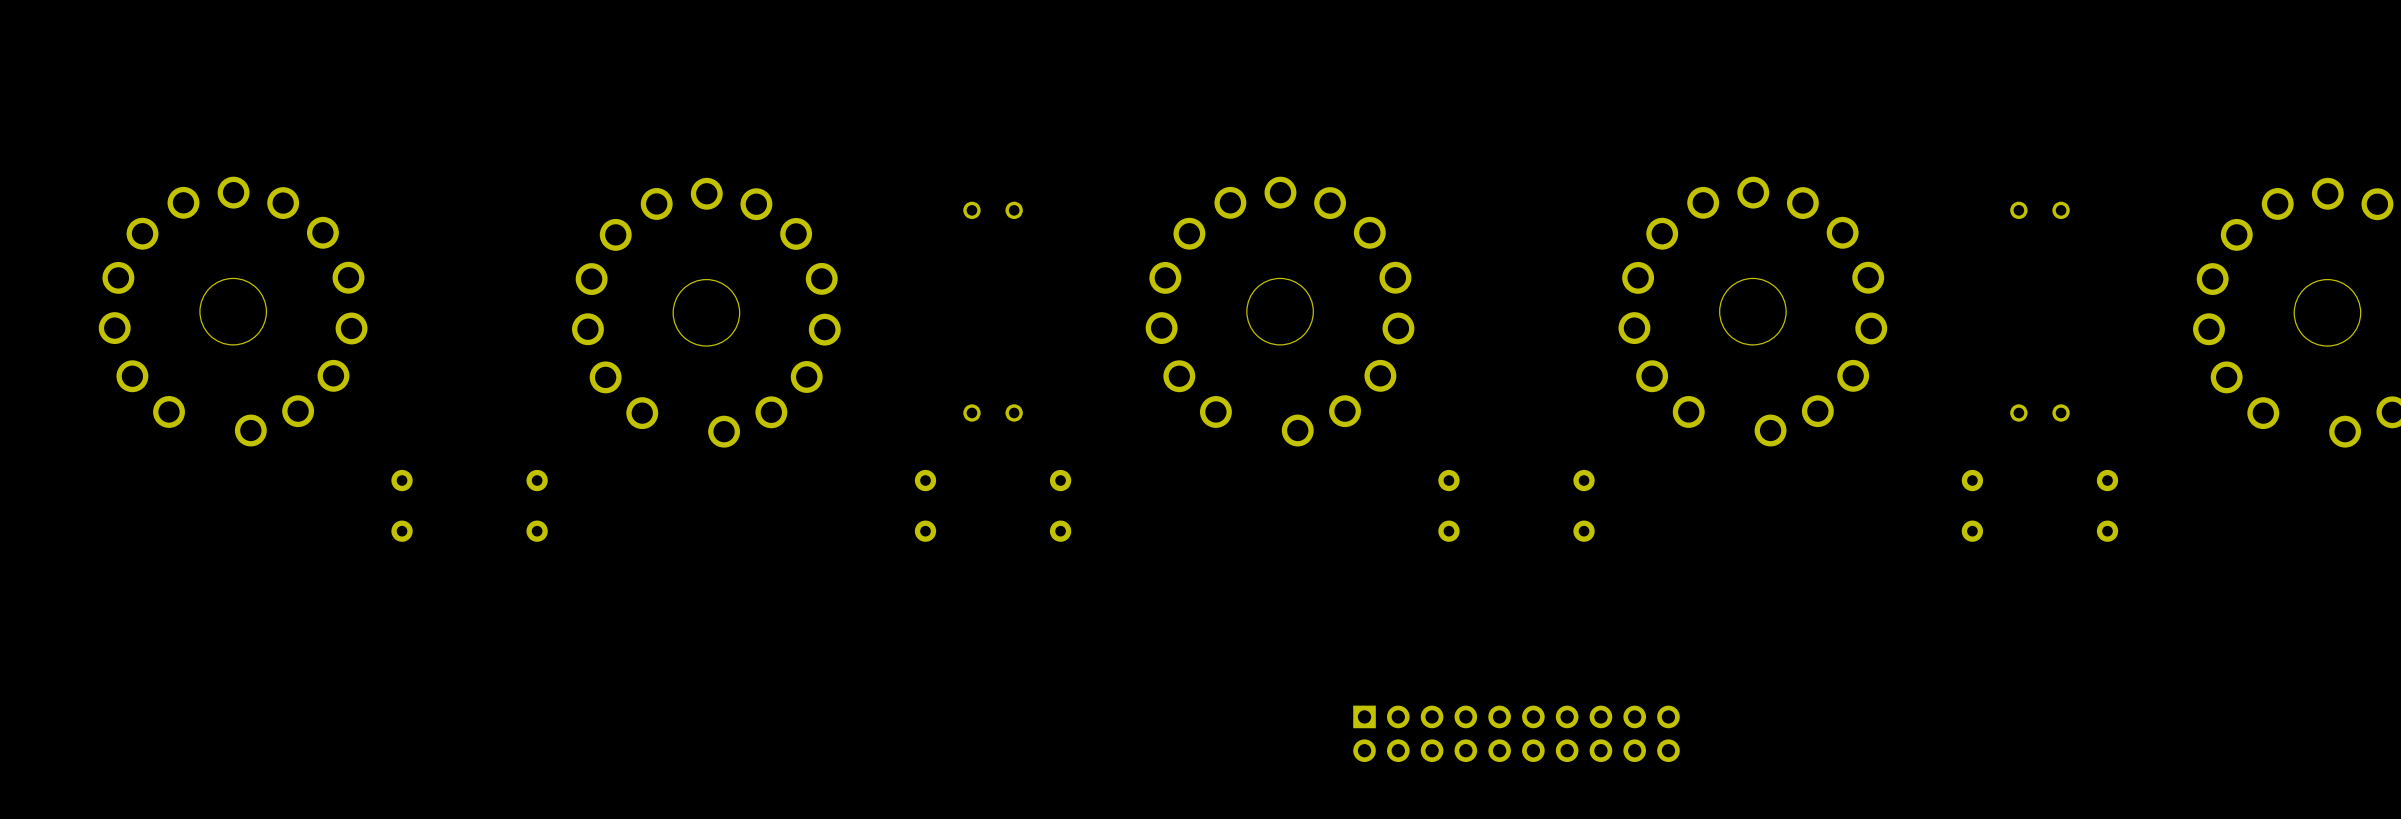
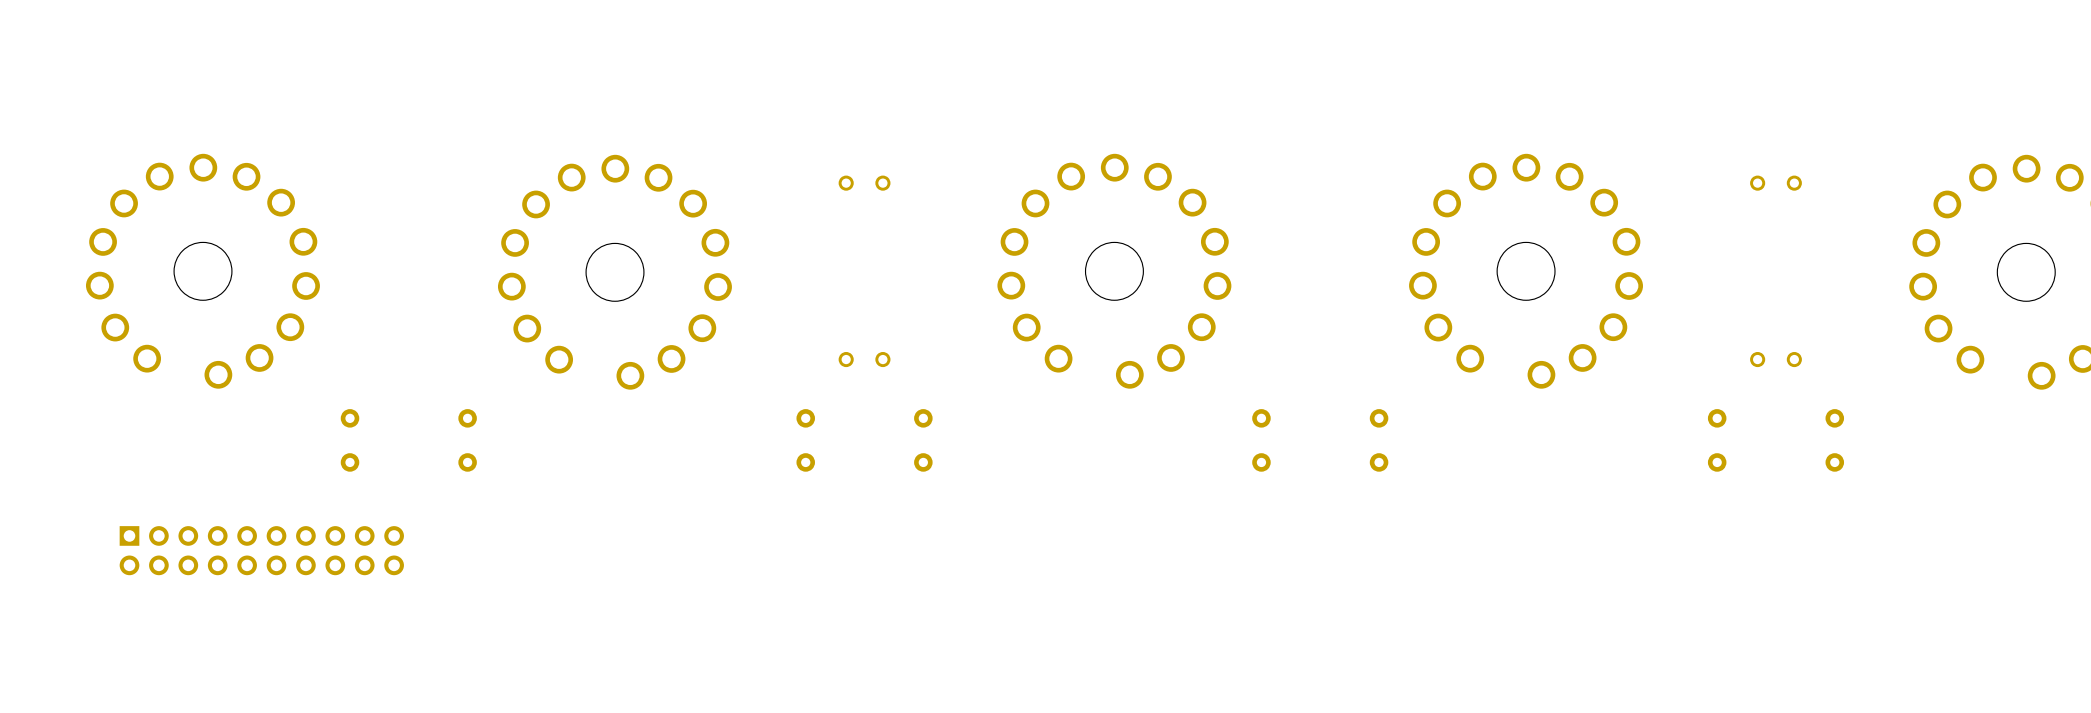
part: none -> (261, 550)
part: (1516, 733) -> none

